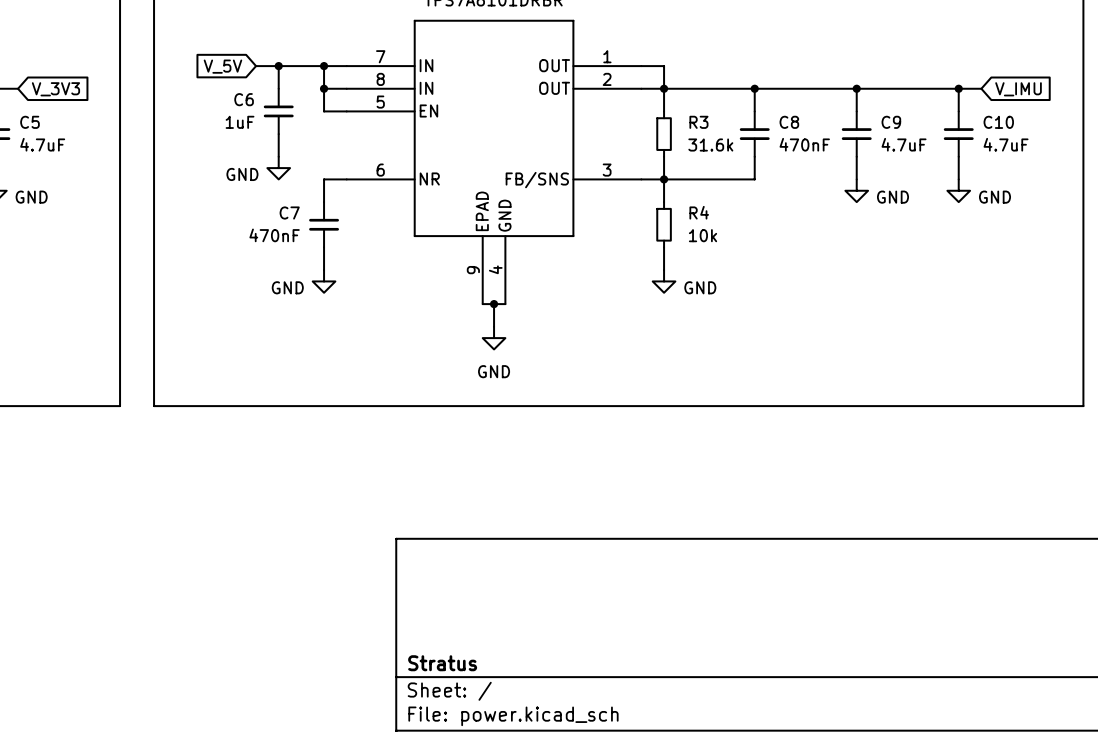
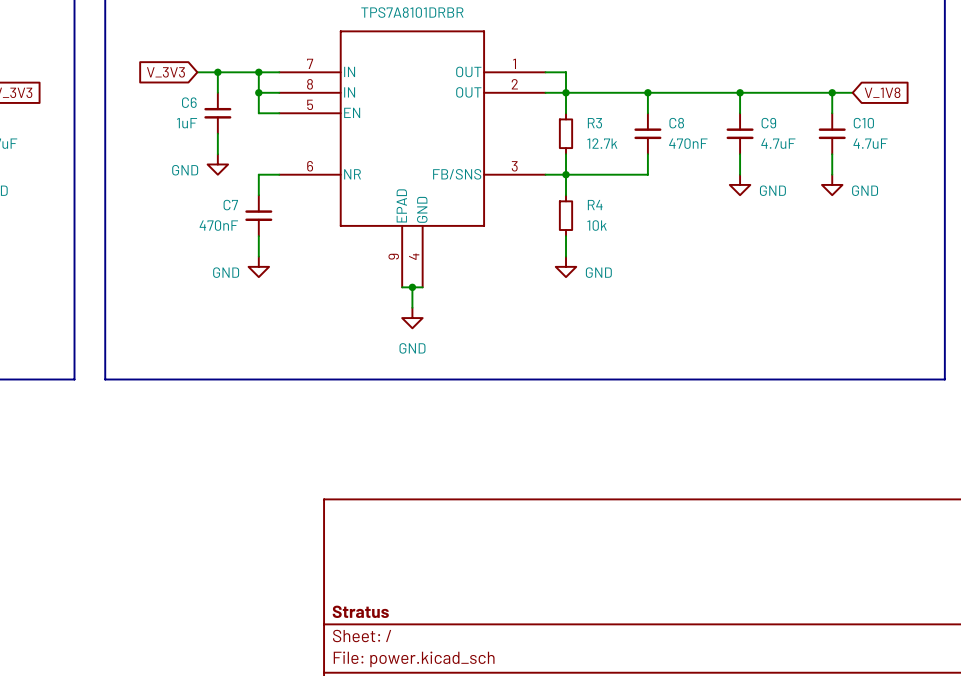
global label: V_5V (222, 66) -> V_3V3 (165, 72)
global label: V_IMU (1018, 89) -> V_1V8 (882, 92)
R3 value: 31.6k (710, 145) -> 12.7k (602, 143)

